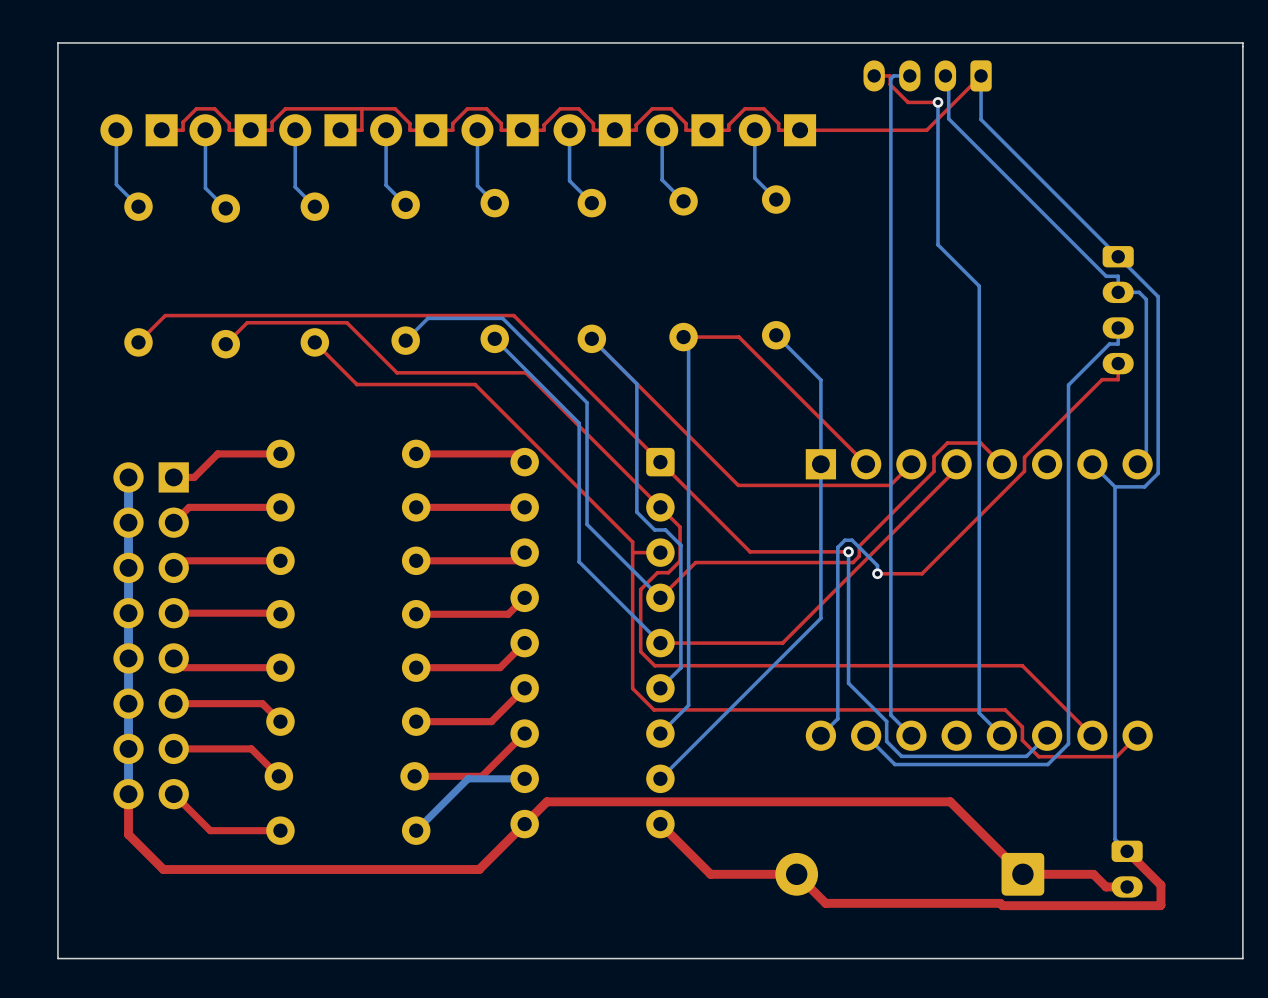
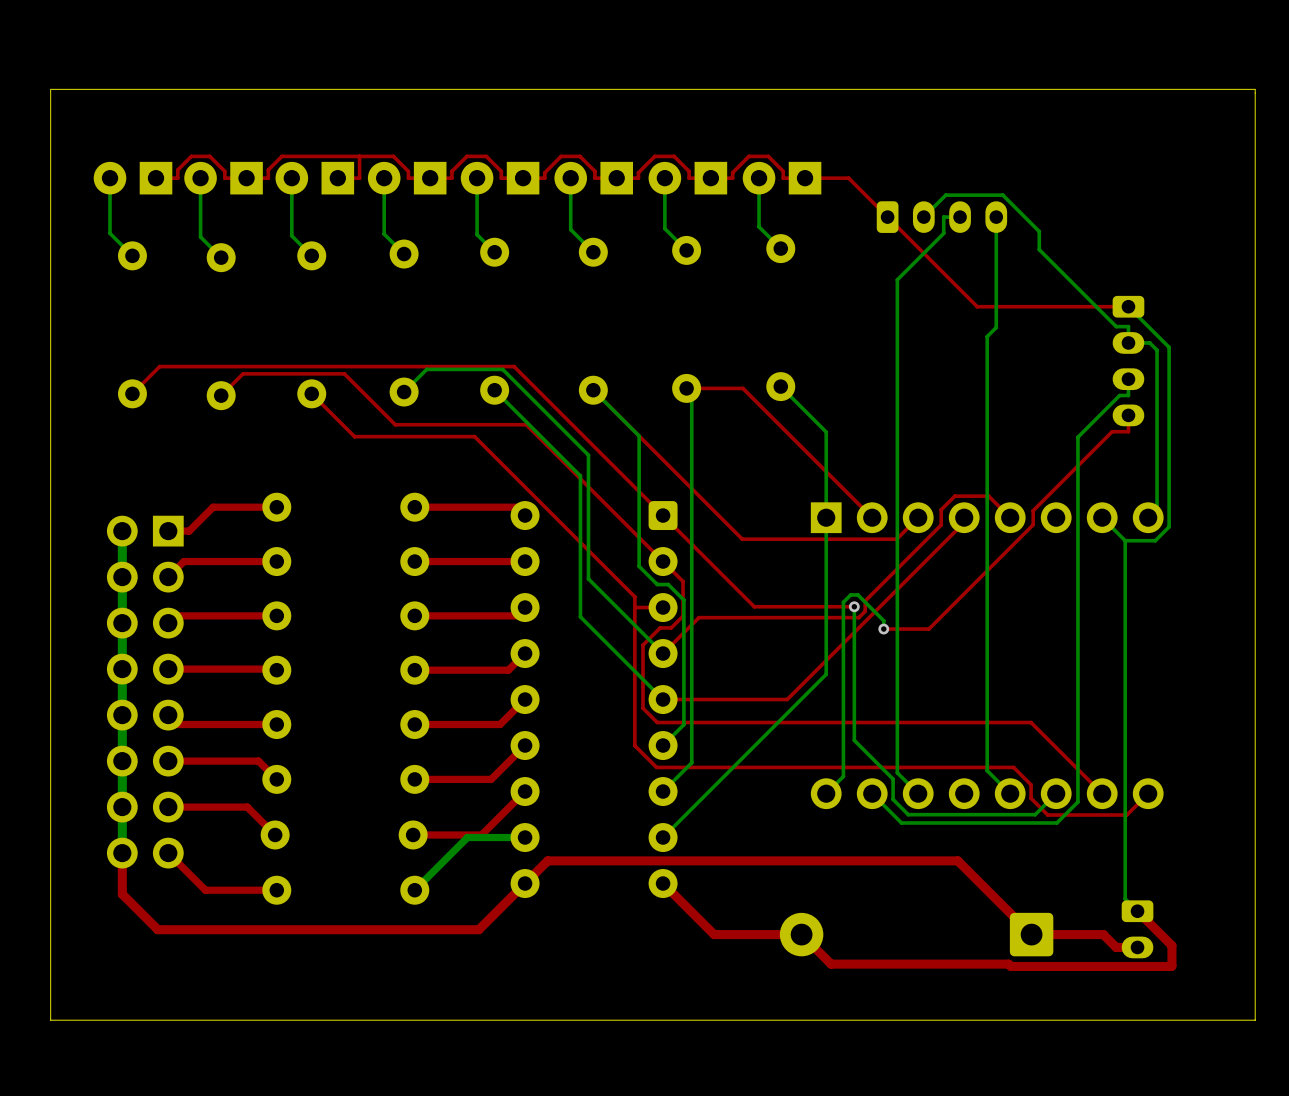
top track: (874, 75) (890, 75) (890, 84) (908, 102) (938, 102) -> none
bottom track: (909, 75) (893, 75) (890, 78) (890, 230) -> (960, 217) (943, 217) (943, 233) (897, 279)
part rotation: 0° (927, 75) -> 180° (941, 217)
part position: (927, 75) -> (941, 217)
bottom track: (945, 75) (948, 79) (948, 118) (1030, 200) -> (923, 217) (945, 195) (1002, 195) (1039, 231) (1039, 249)
top track: (981, 75) (926, 130) (843, 130) -> (1128, 306) (977, 306) (848, 178)
bottom track: (981, 75) (981, 119) (1118, 256) -> none
bottom track: (938, 102) (938, 244) (979, 286) -> (996, 217) (996, 327) (987, 336)
via: (938, 102) -> none

